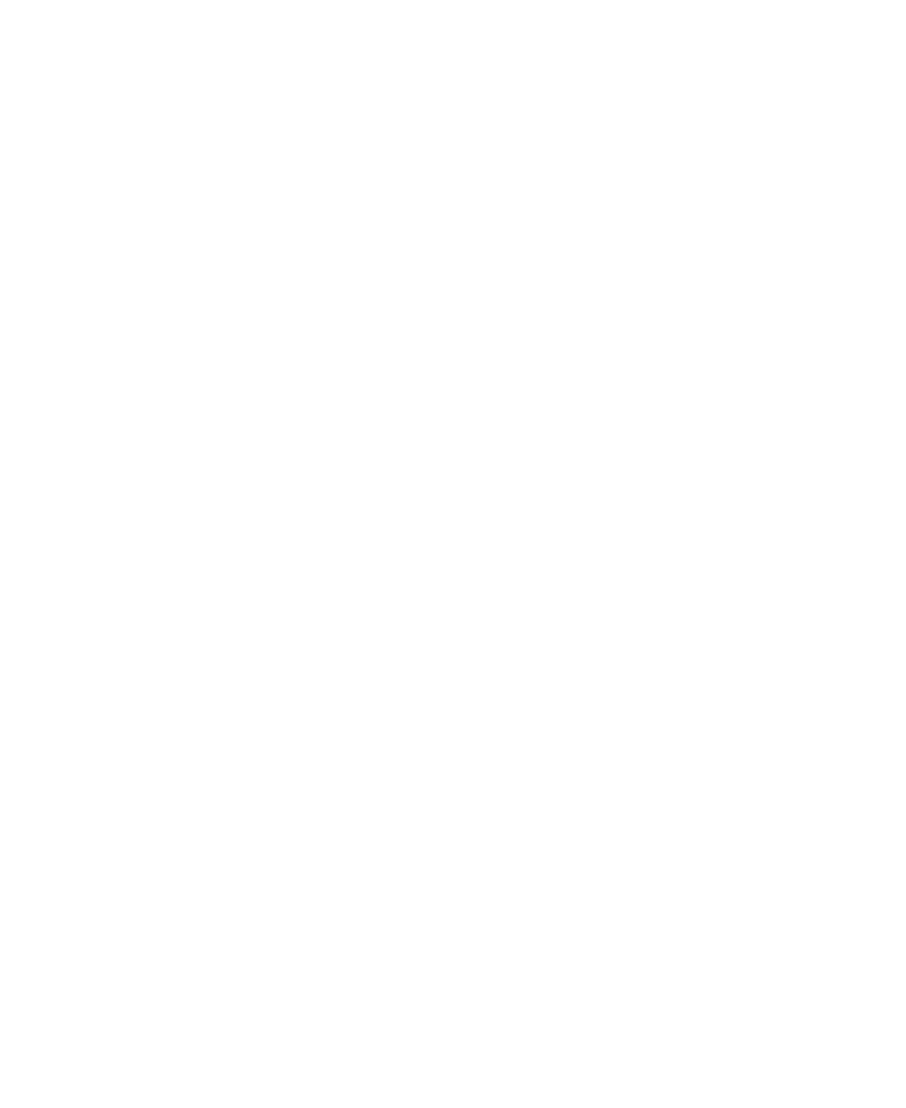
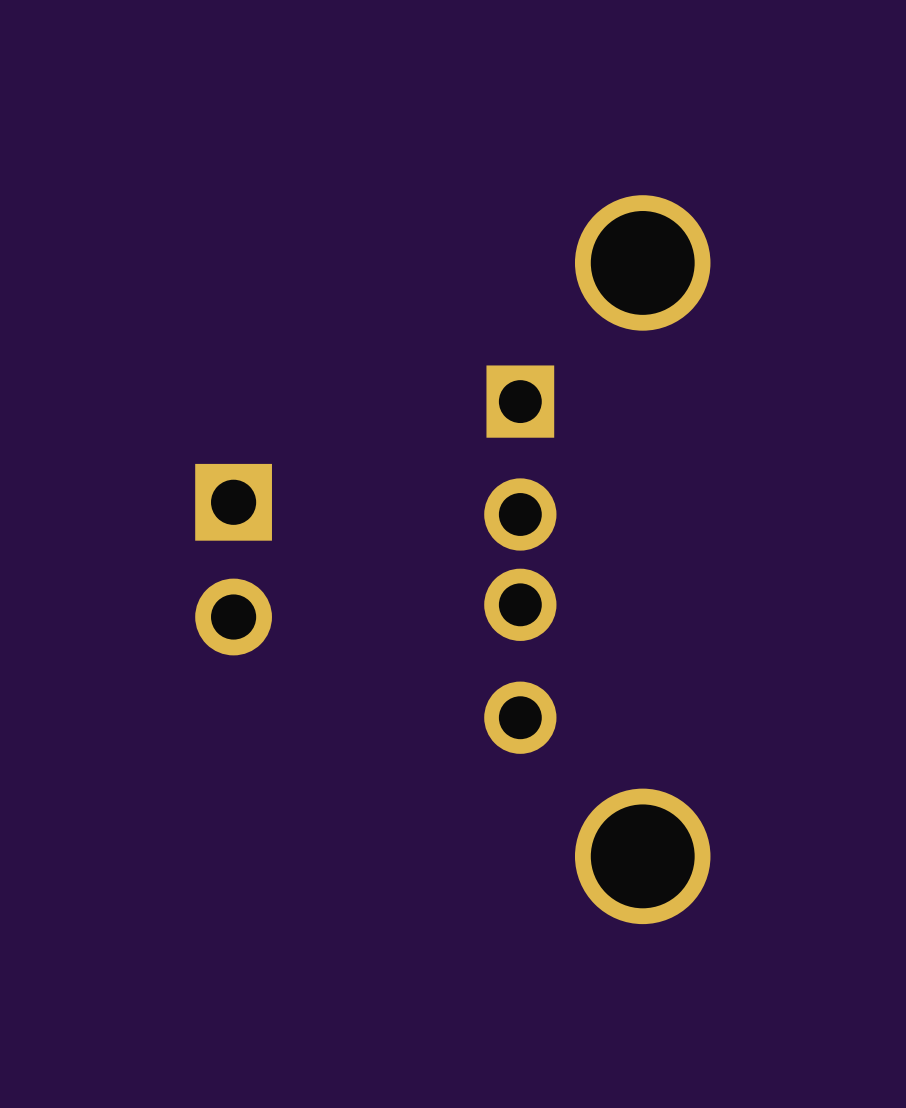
part: none -> (233, 559)
part: none -> (597, 559)

